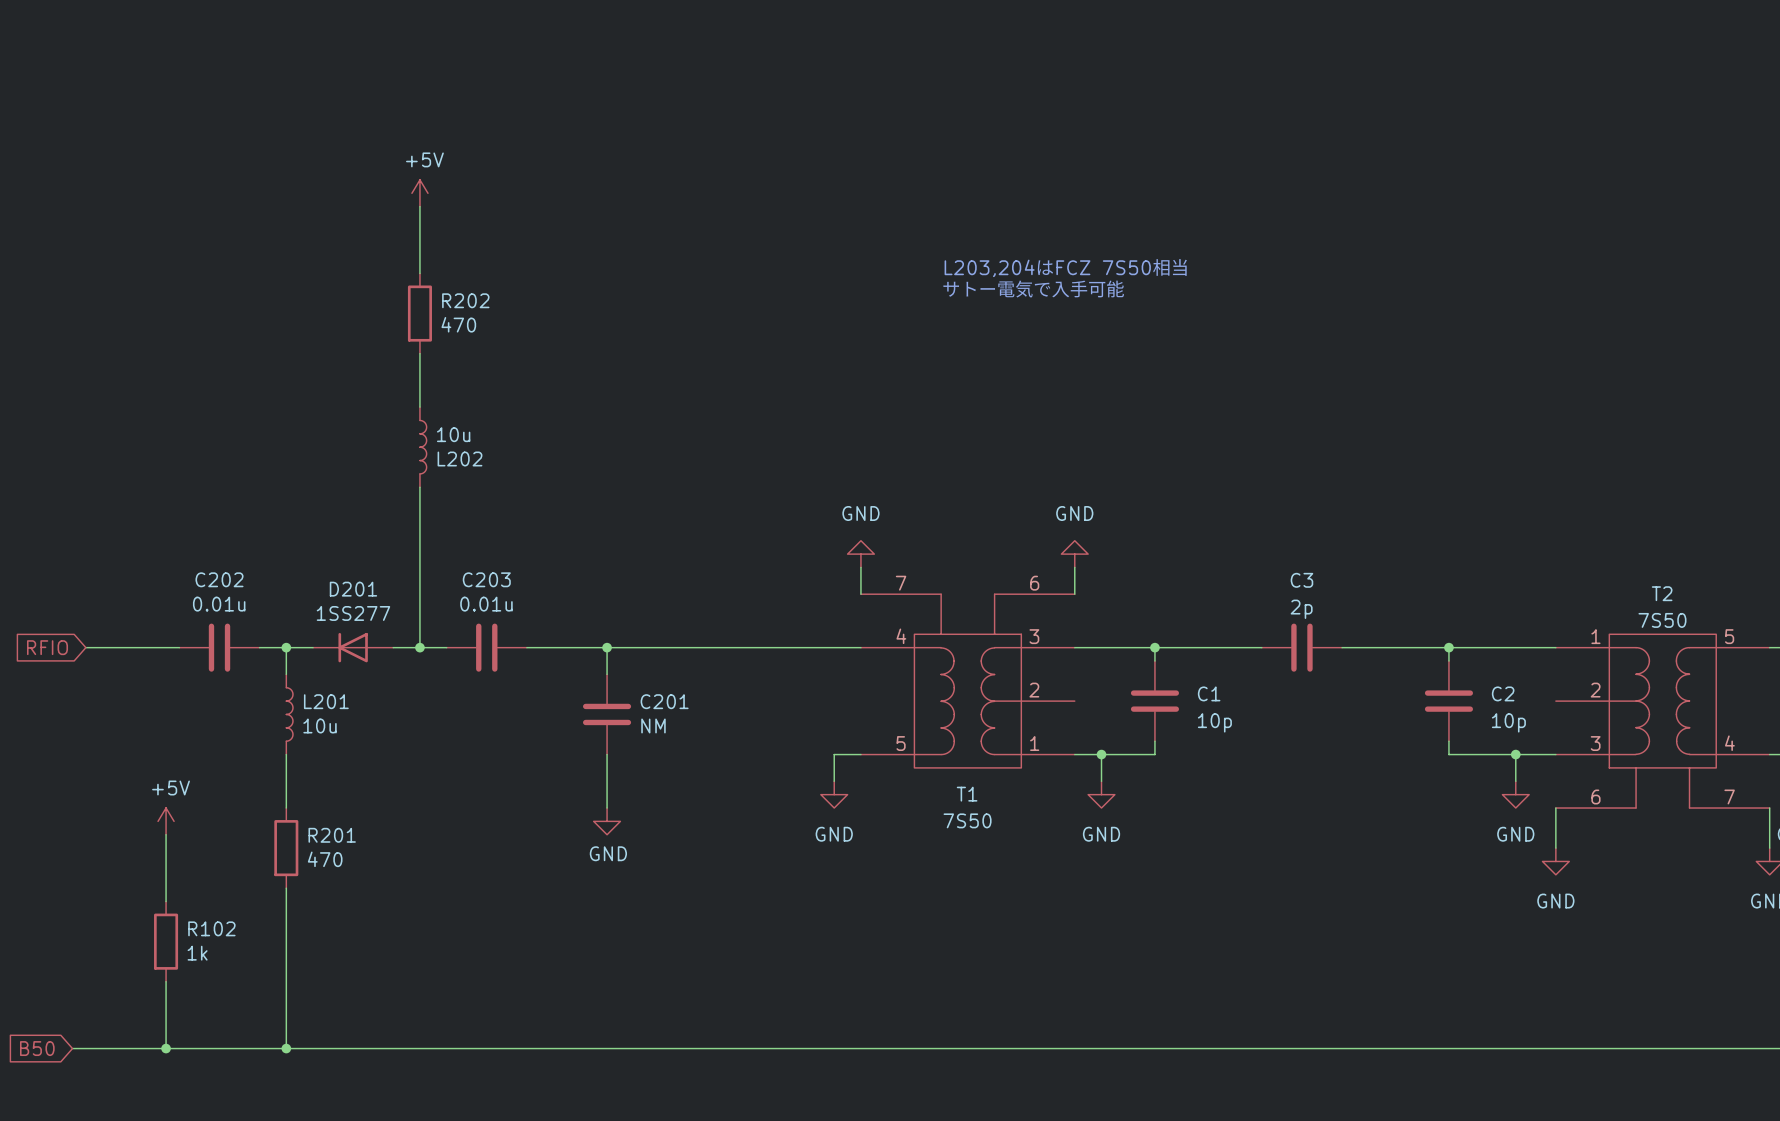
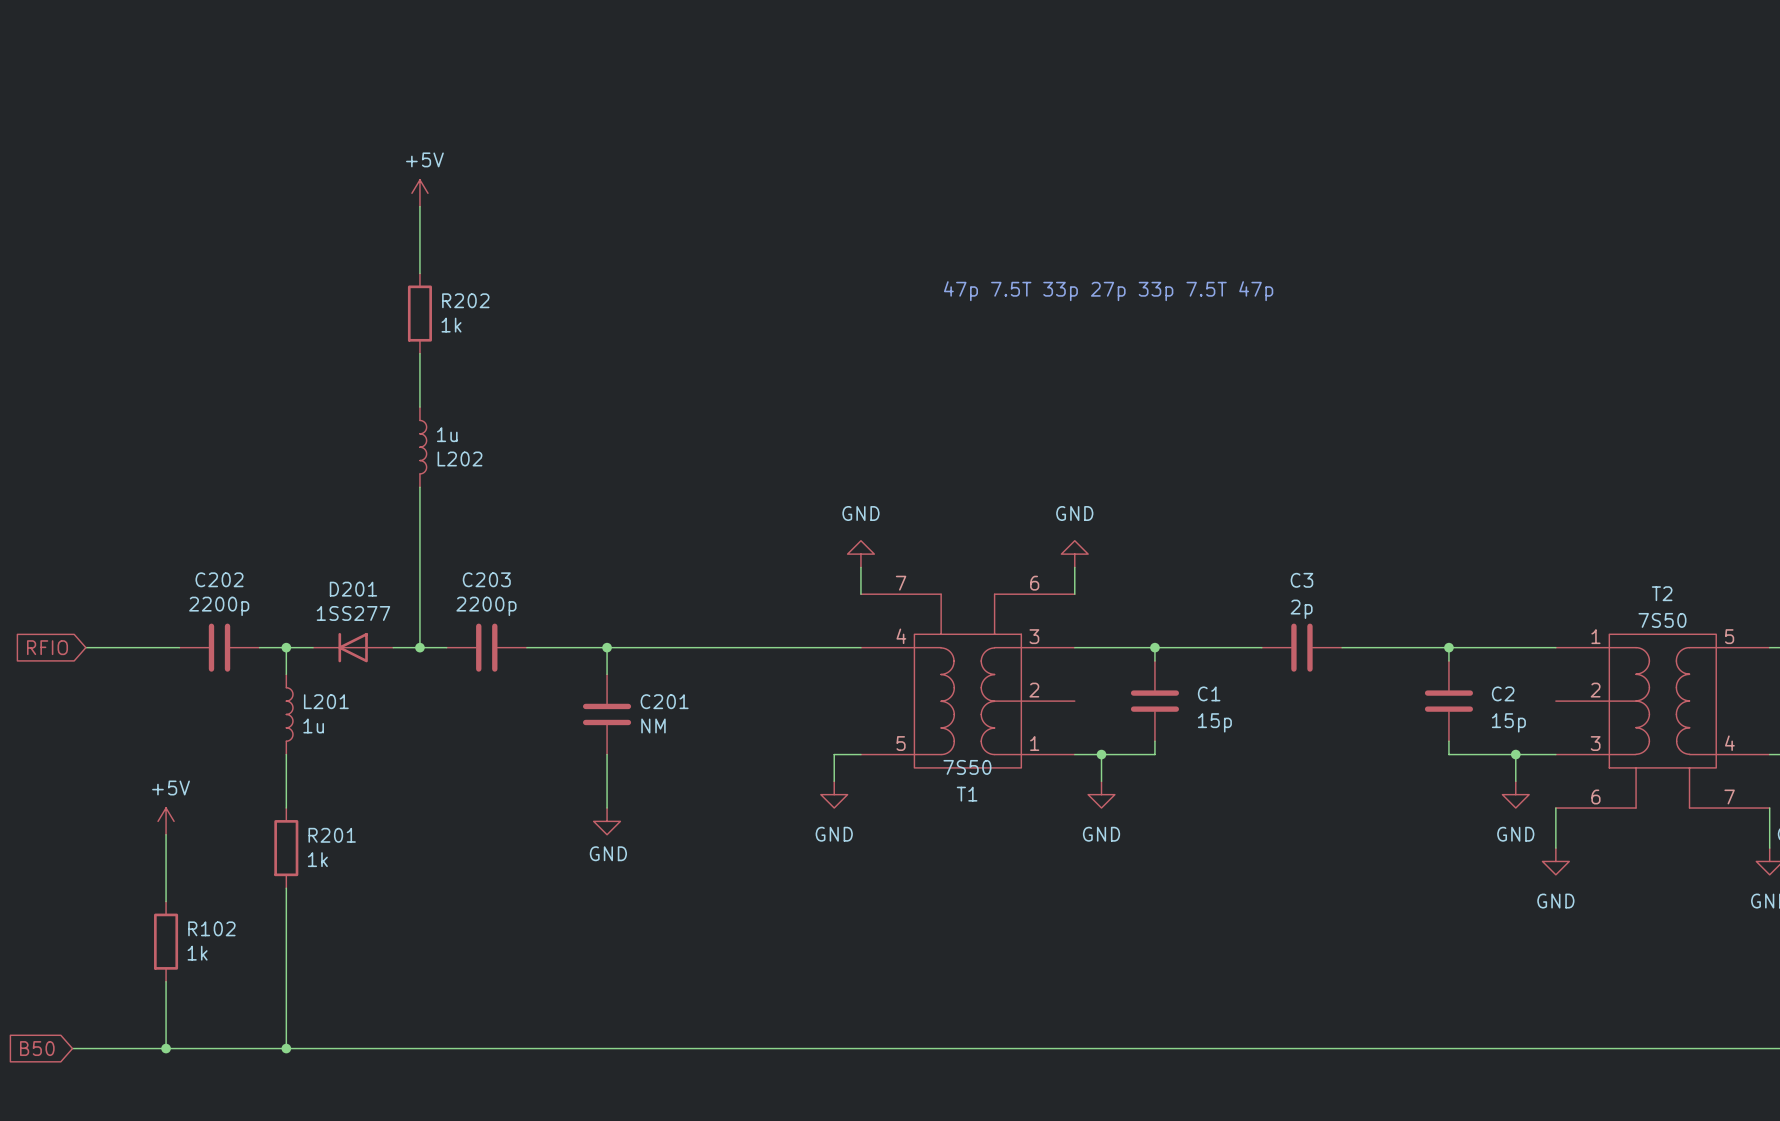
text: L203,204はFCZ 7S50相当 (1066, 267) -> none
text: サトー電気で入手可能 (1033, 289) -> 47p 7.5T 33p 27p 33p 7.5T 47p (1108, 291)
R202 value: 470 (458, 324) -> 1k (451, 325)
L202 value: 10u (453, 434) -> 1u (447, 434)
C202 value: 0.01u (219, 604) -> 2200p (219, 606)
C203 value: 0.01u (486, 604) -> 2200p (486, 606)
C1 value: 10p (1214, 722) -> 15p (1214, 722)
C2 value: 10p (1508, 722) -> 15p (1508, 722)
L201 value: 10u (320, 725) -> 1u (313, 725)
T1 value position: 7S50 (967, 820) -> 7S50 (967, 767)
R201 value: 470 (325, 859) -> 1k (317, 859)

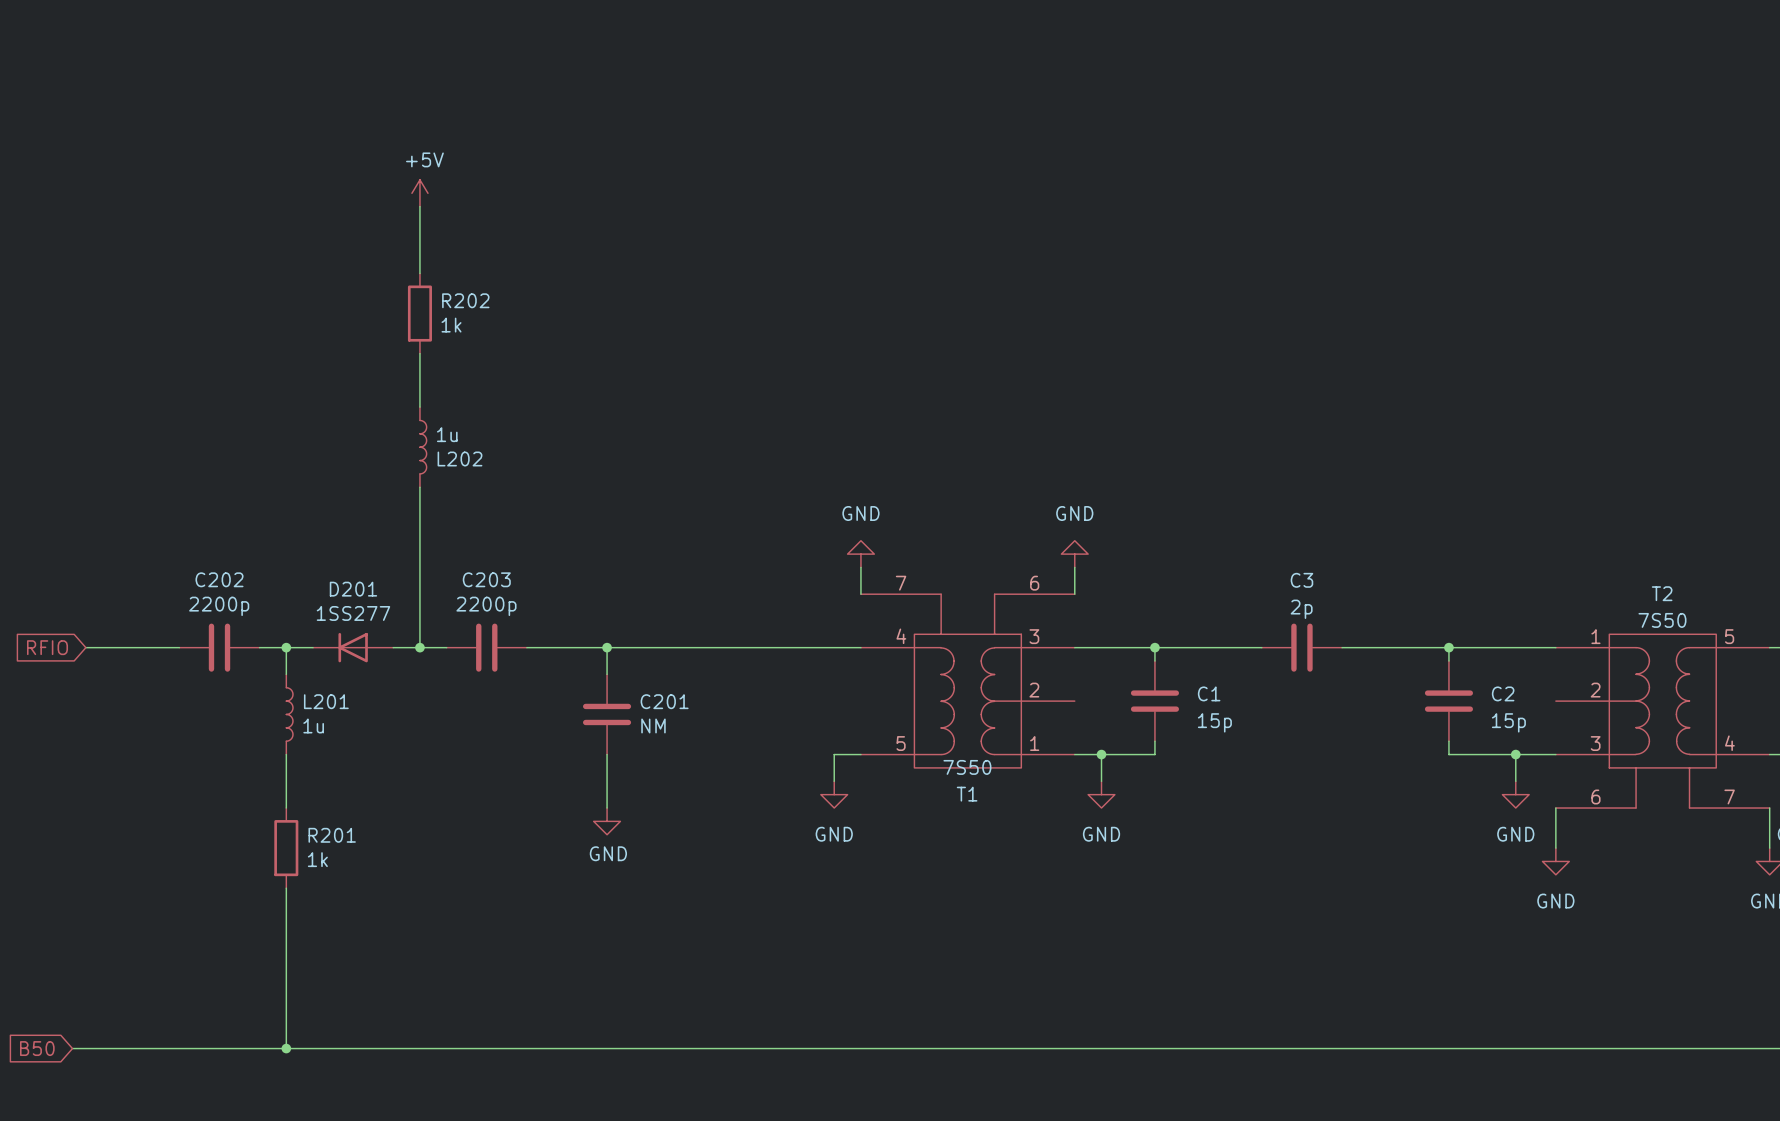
text: 47p 7.5T 33p 27p 33p 7.5T 47p (1108, 291) -> none
power symbol: +5V (166, 821) -> none
wire: (166, 834) (166, 901) -> none
R102: 1k (166, 941) -> none
wire: (166, 981) (166, 1048) -> none
junction: (166, 1048) -> none

